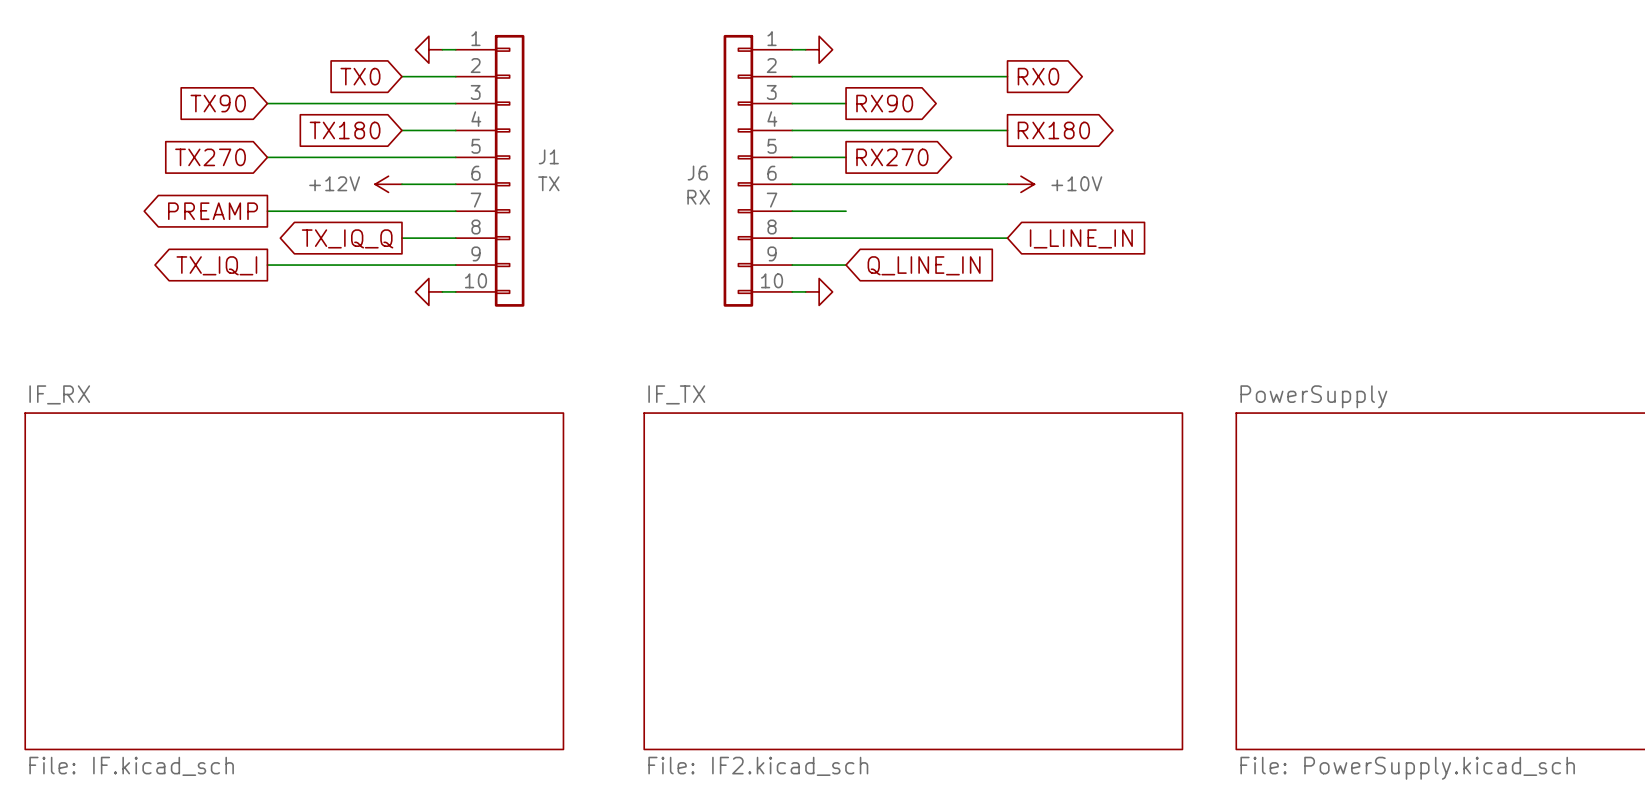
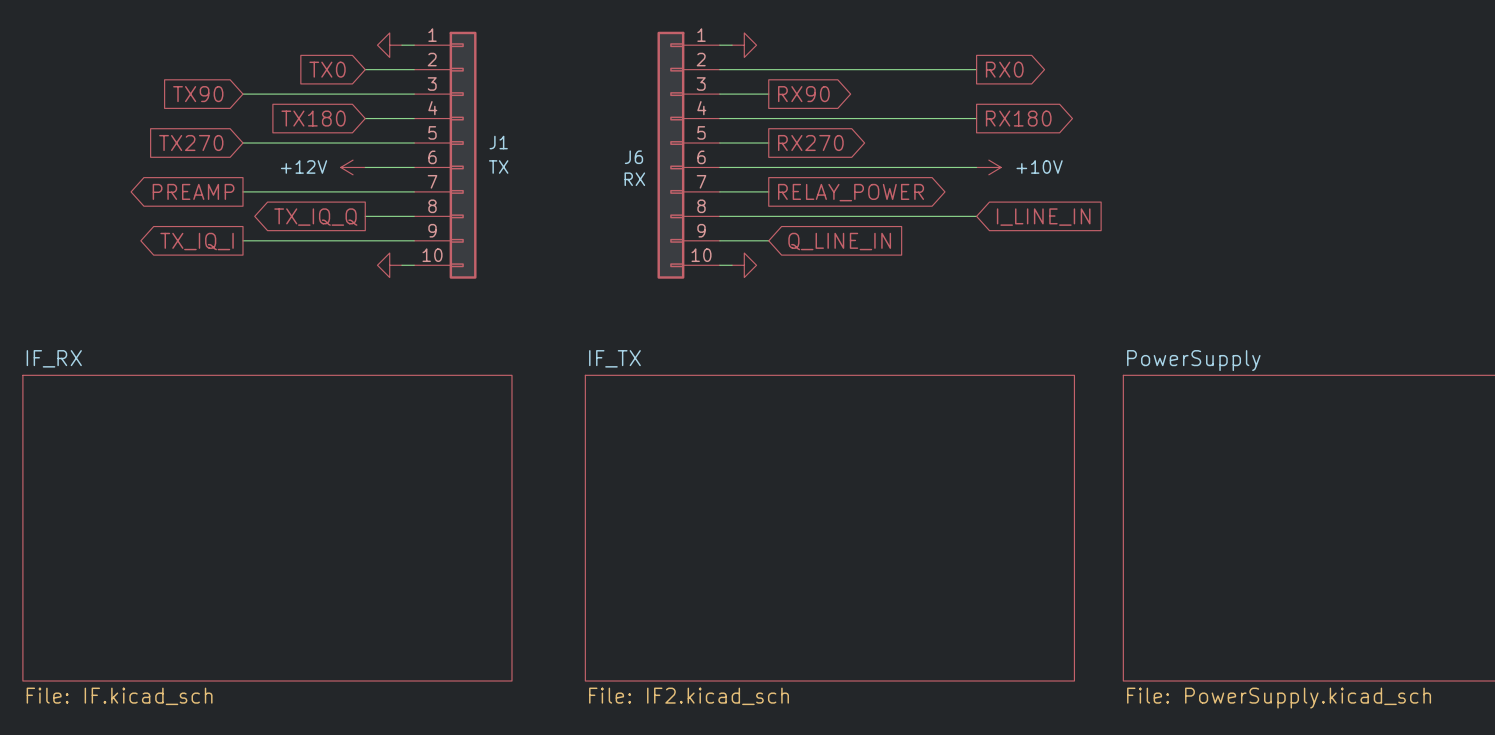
wire: none -> (915, 69) (976, 69)
global label position: RX0 (1038, 76) -> RX0 (1004, 69)
wire: none -> (915, 118) (976, 118)
global label position: RX180 (1053, 130) -> RX180 (1018, 118)
wire: none -> (915, 167) (976, 167)
power symbol position: +10V (1020, 184) -> +10V (988, 167)
global label: none -> RELAY_POWER (851, 192)
wire: none -> (915, 216) (976, 216)
global label position: I_LINE_IN (1081, 238) -> I_LINE_IN (1043, 217)

